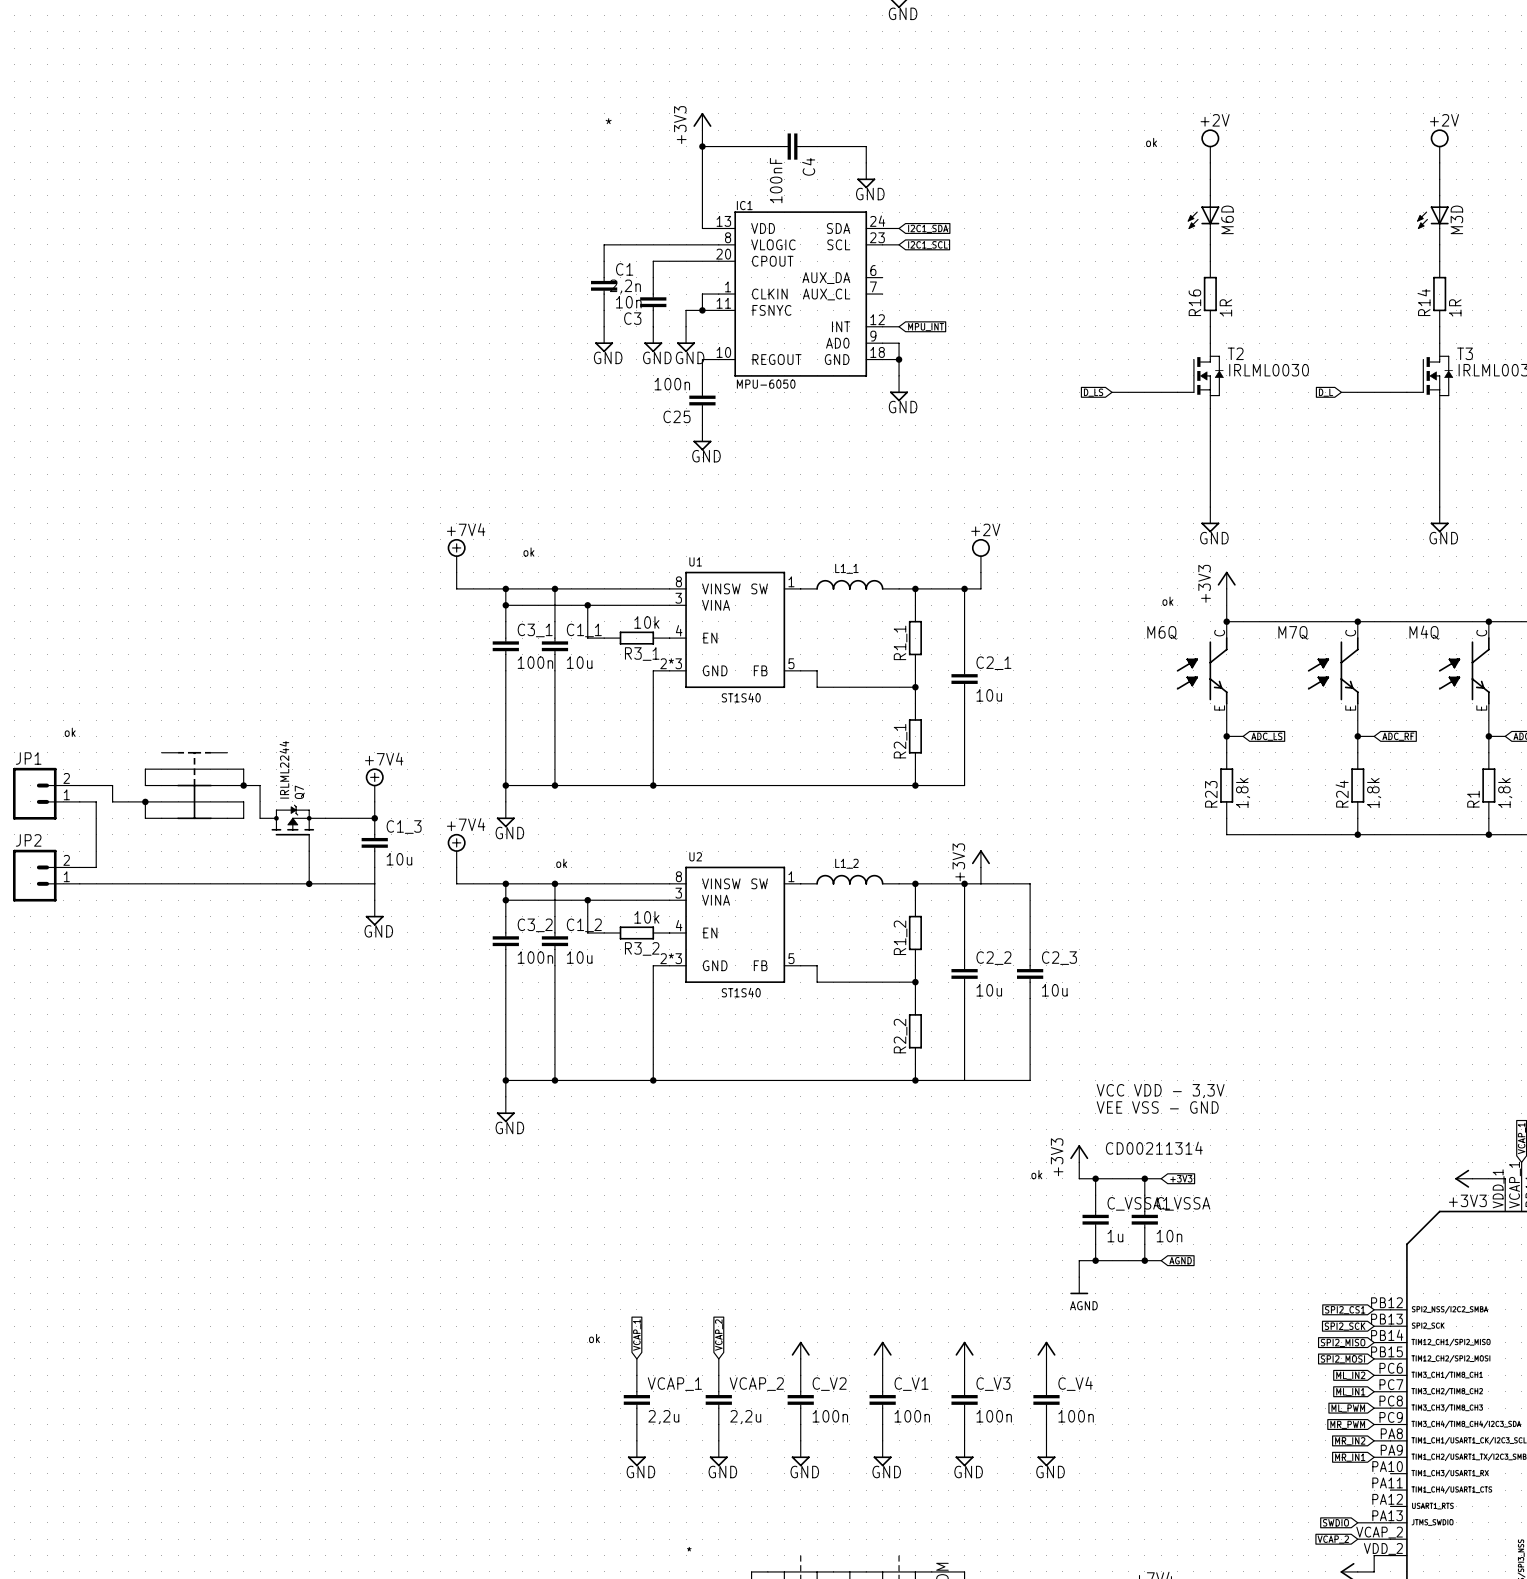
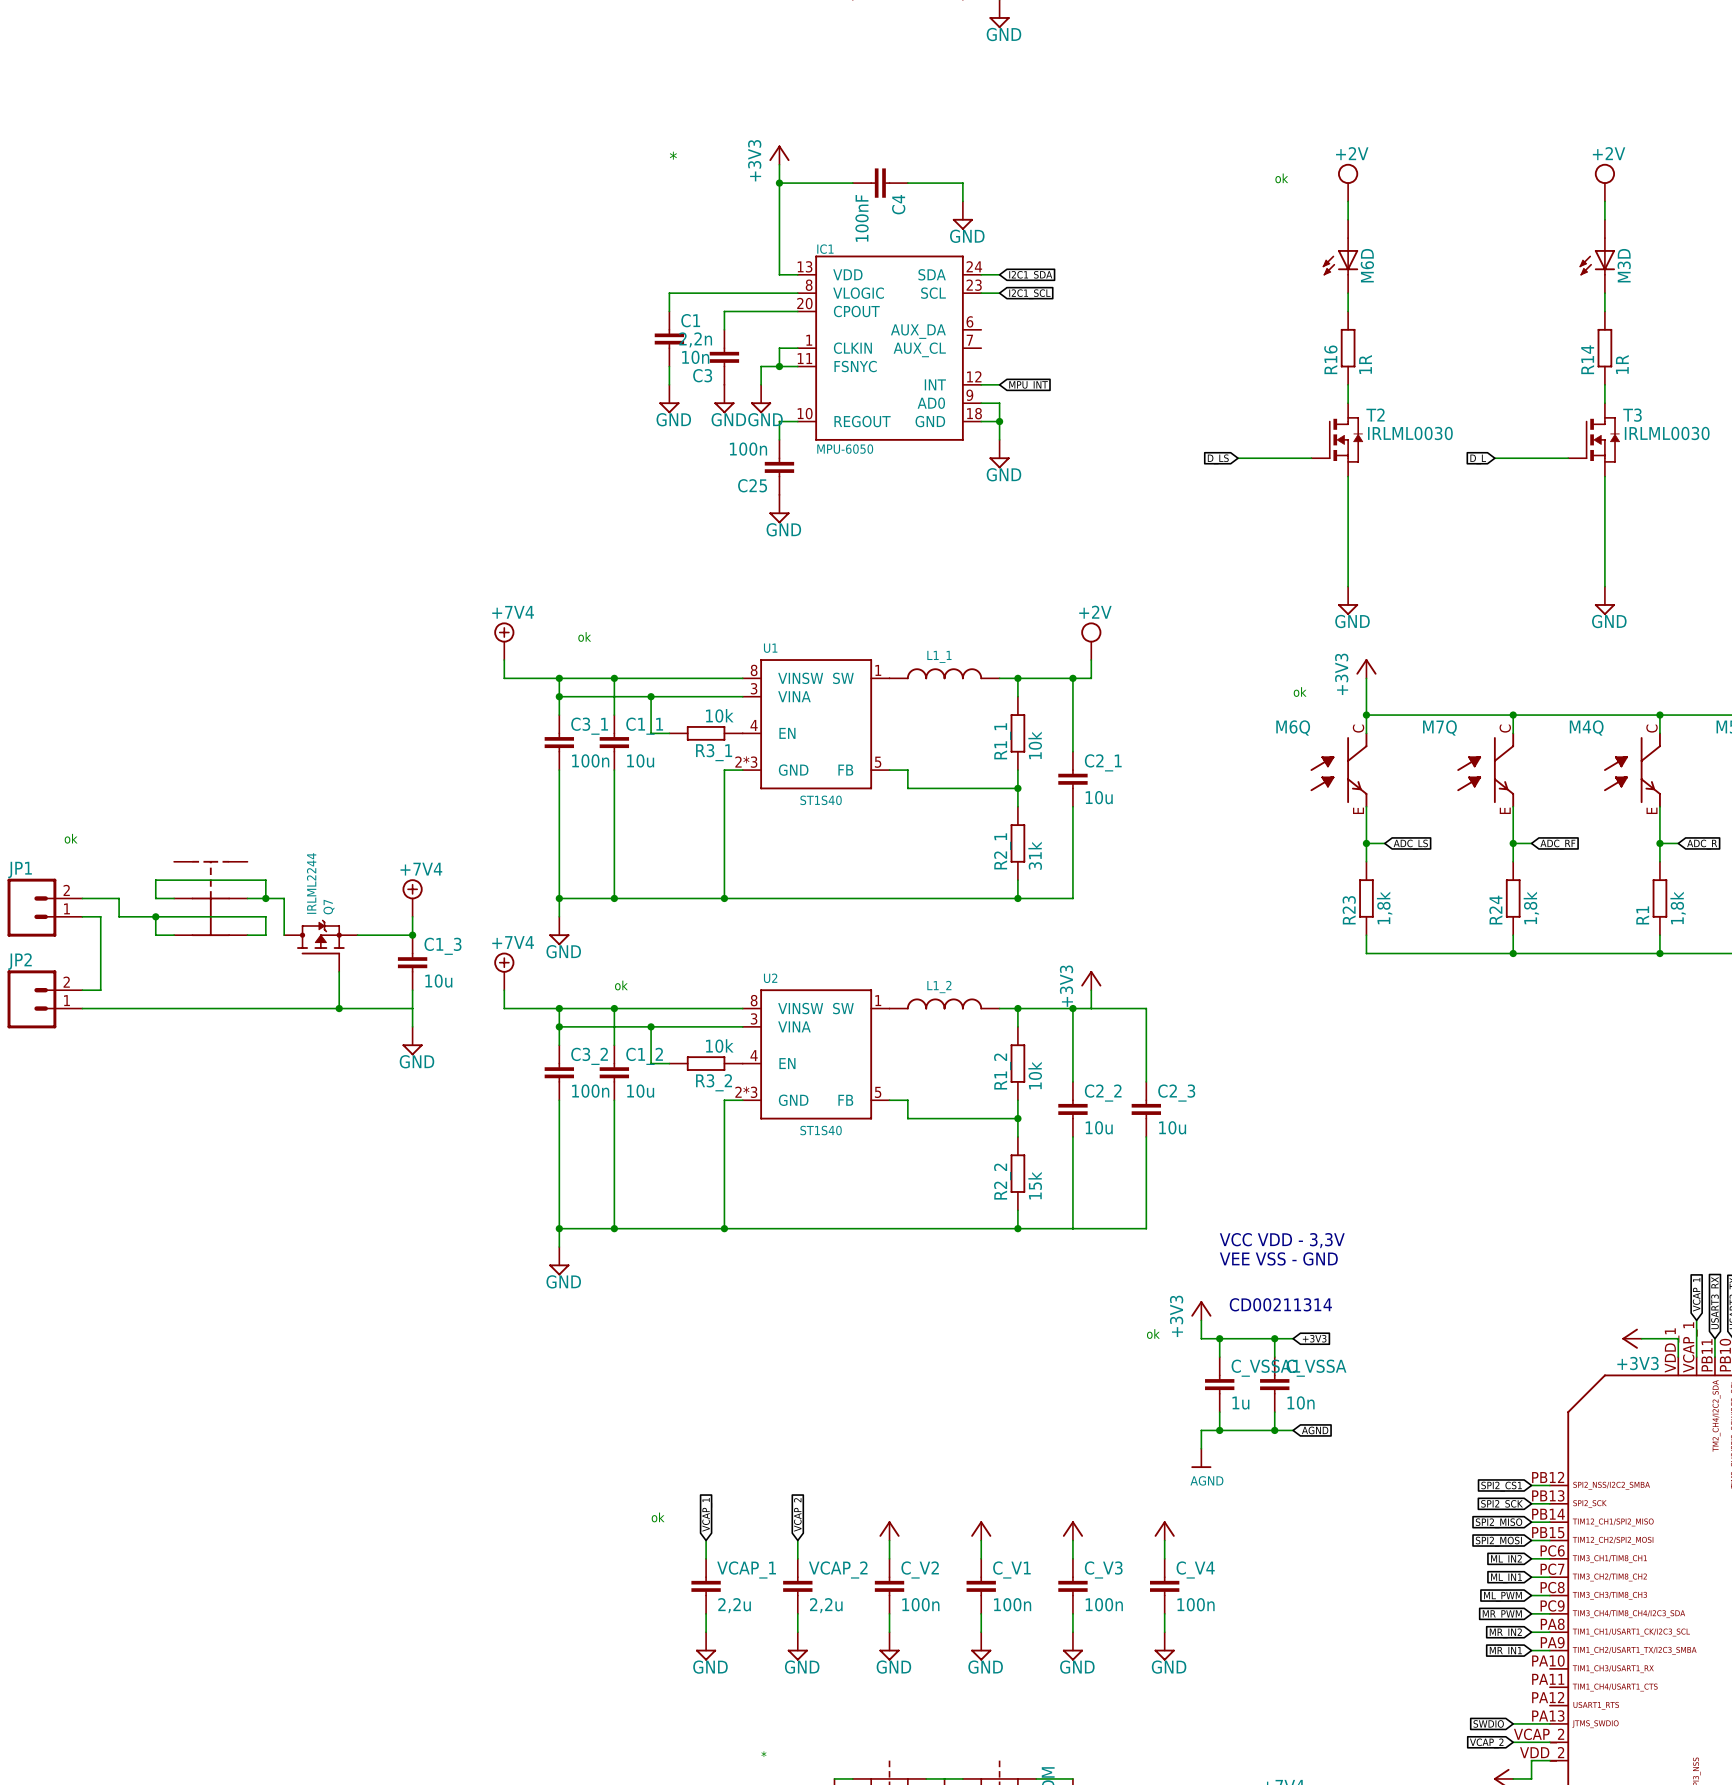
R1_1 value: none -> 10k (1035, 745)
R2_1 value: none -> 31k (1035, 855)
R1_2 value: none -> 10k (1035, 1075)
R2_2 value: none -> 15k (1035, 1185)

